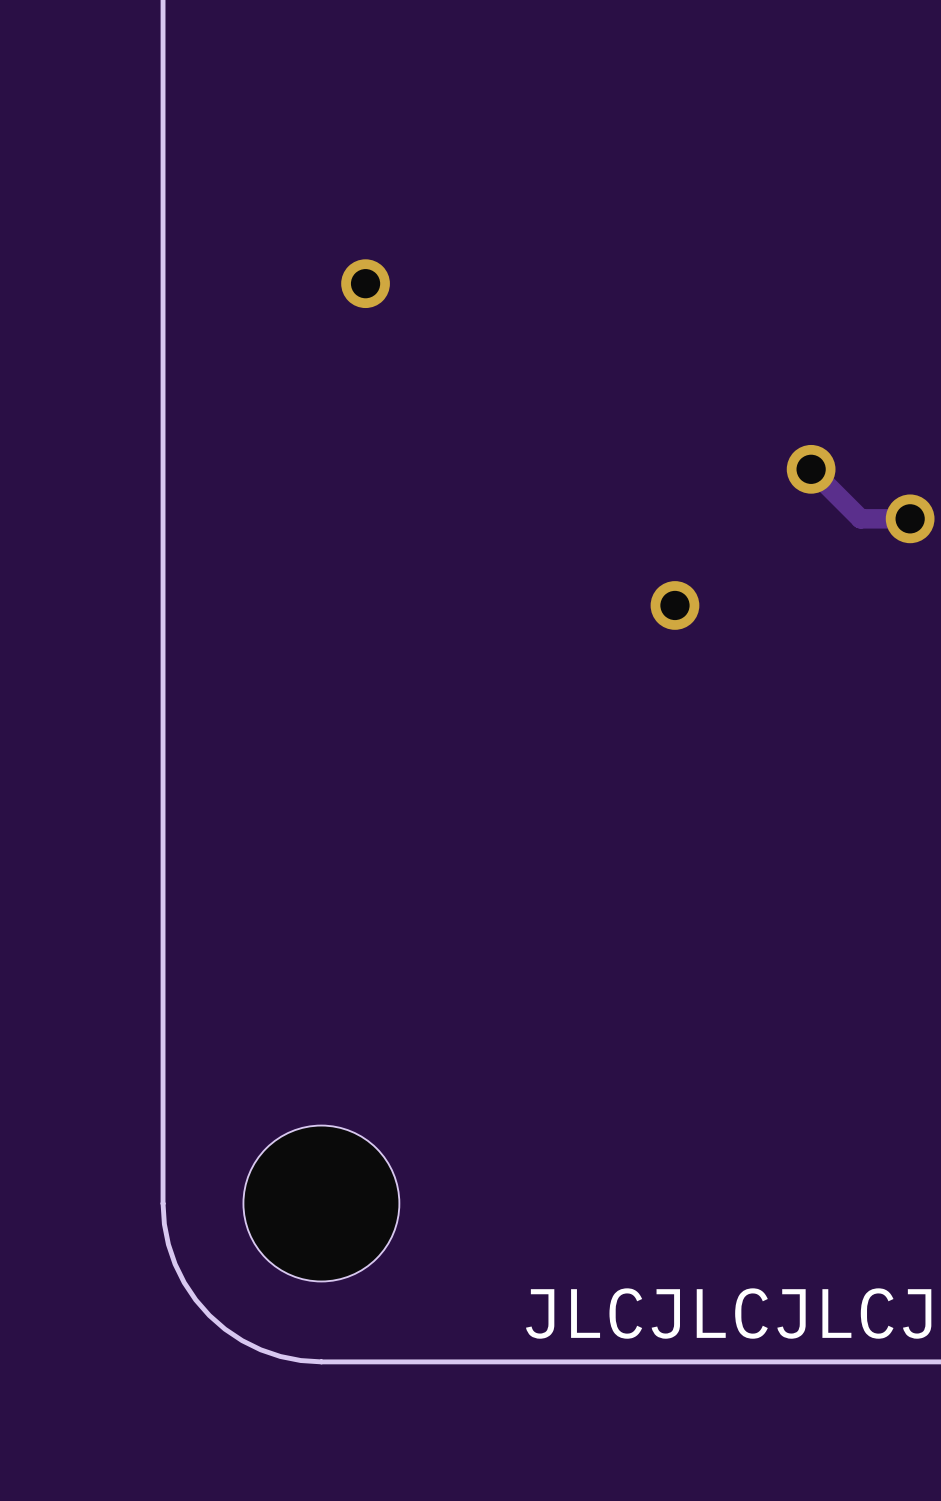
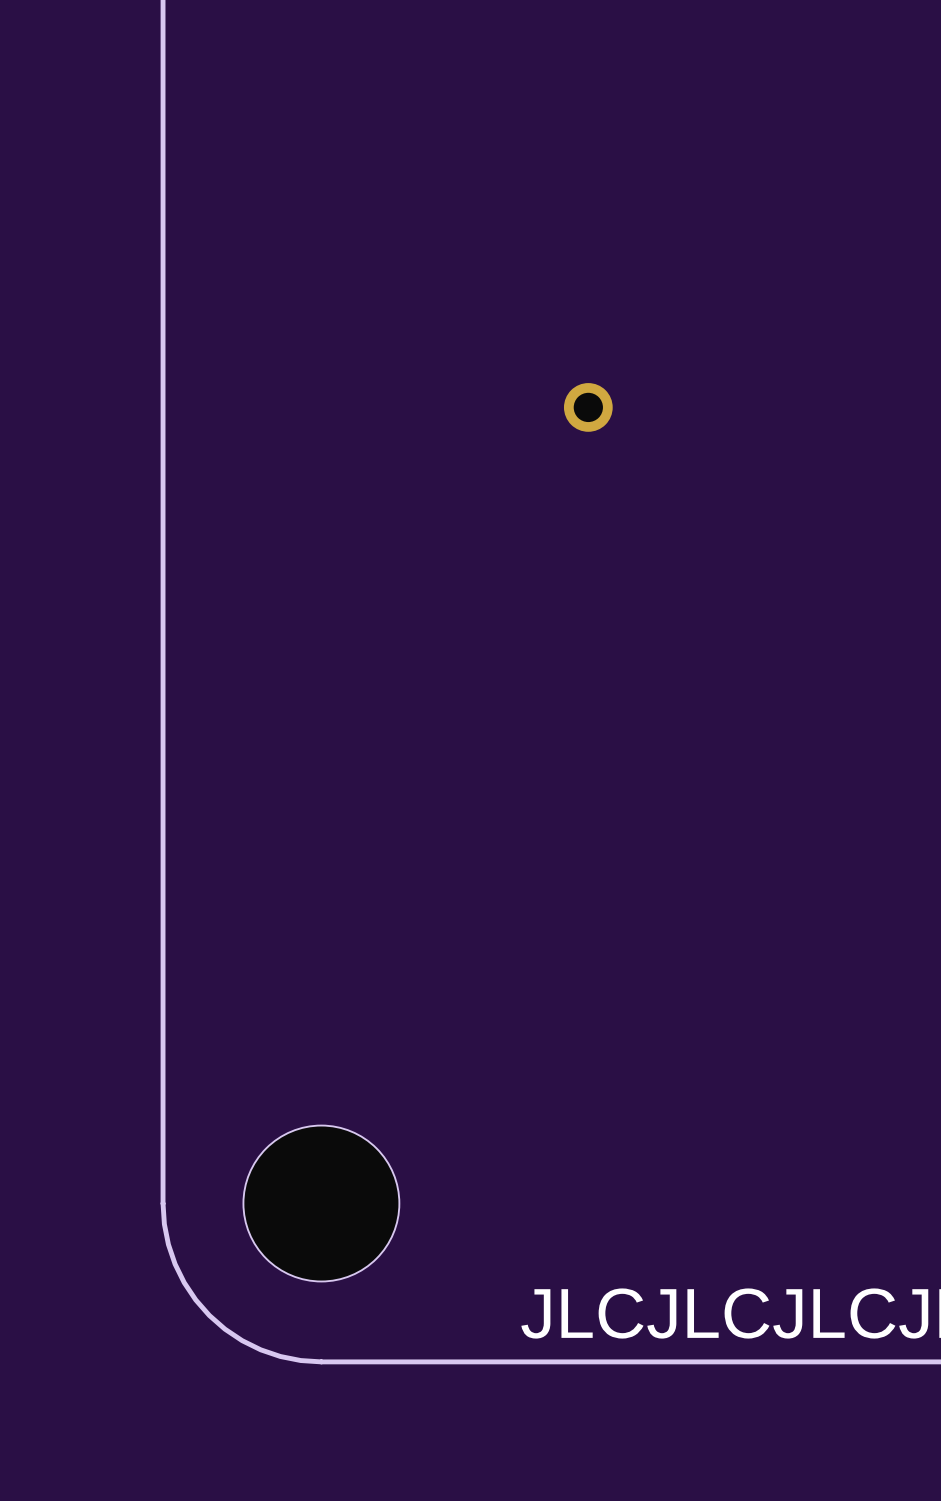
via: (365, 283) -> none
via: none -> (588, 407)
track: (811, 469) (860, 518) (910, 518) -> none
via: (811, 469) -> none
via: (910, 518) -> none
via: (674, 605) -> none

